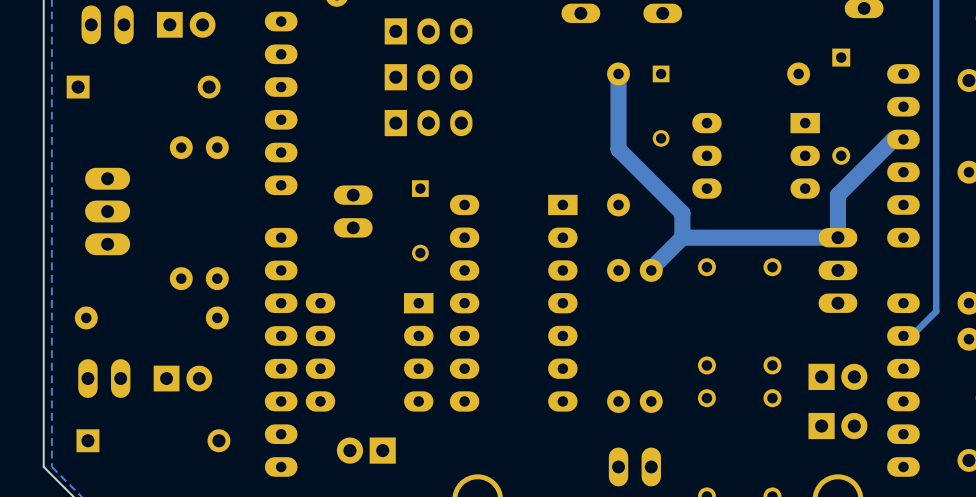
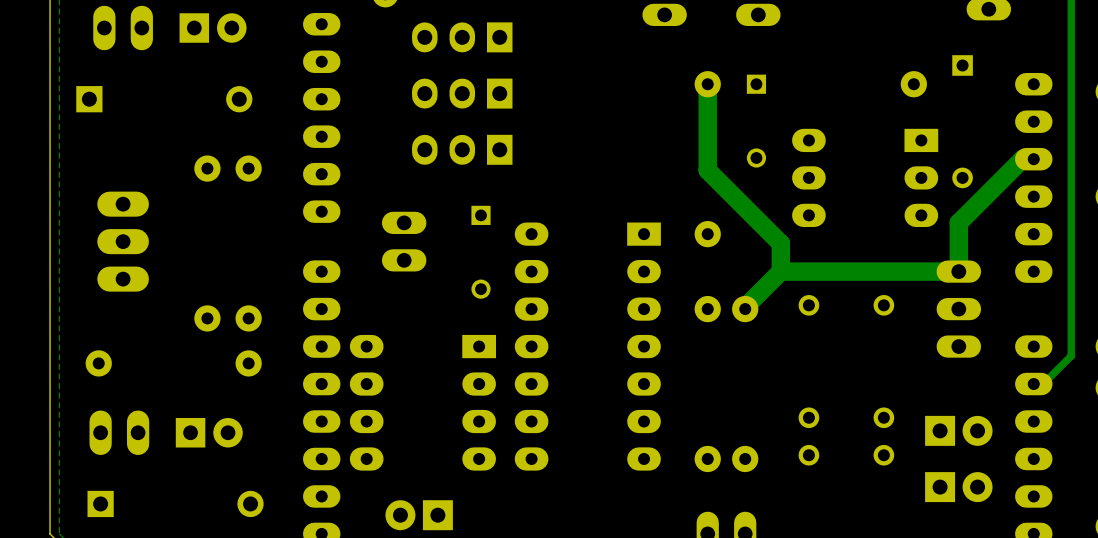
part rotation: 0° (428, 31) -> 180° (462, 37)
part: (428, 77) -> none
part: none -> (462, 93)
part: (428, 123) -> none
part: none -> (462, 149)

